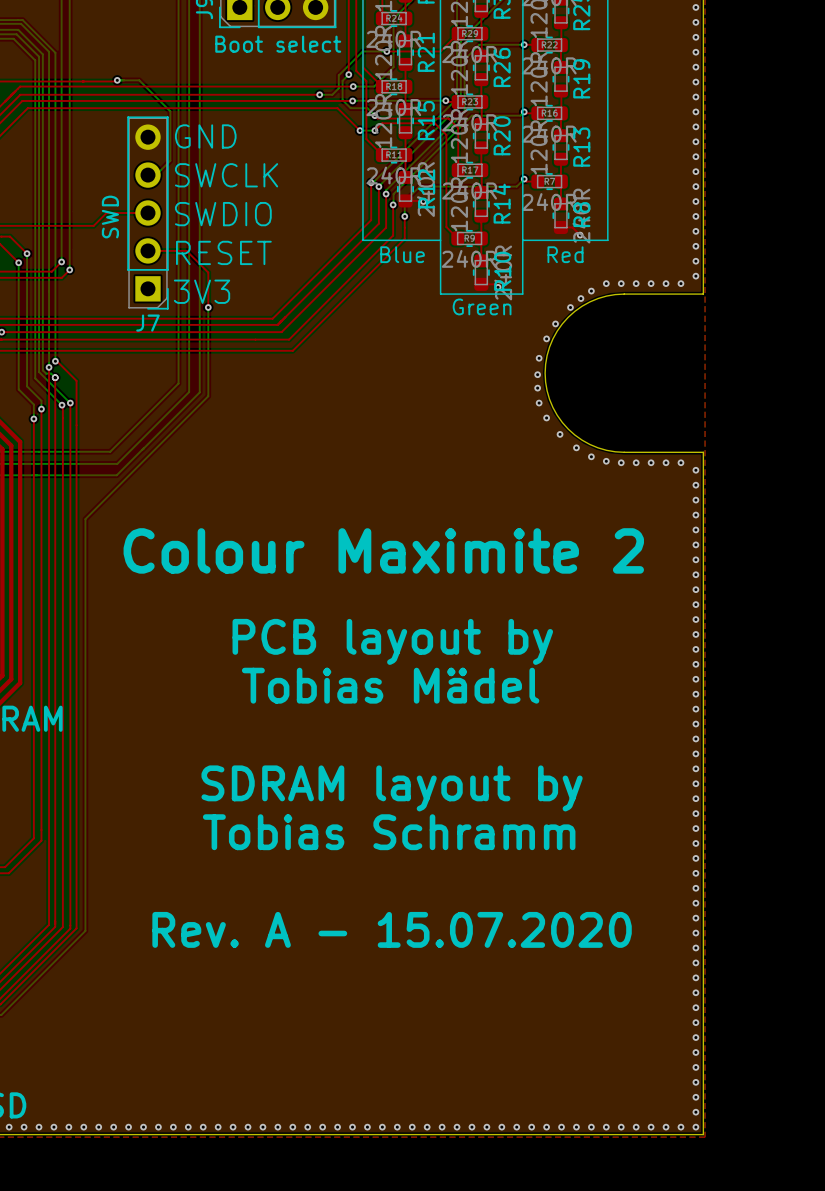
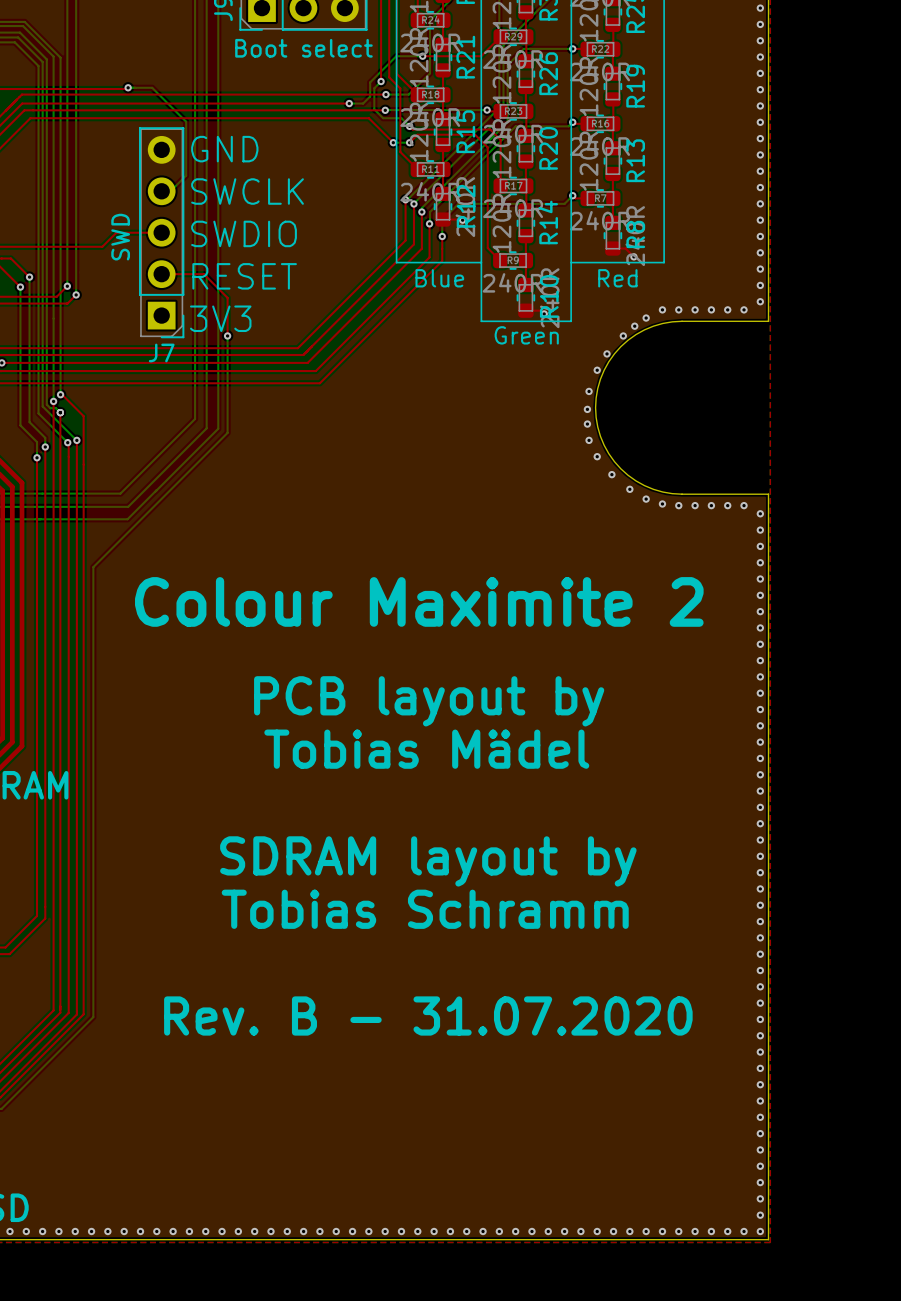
text: Rev. A - 15.07.2020 (392, 929) -> Rev. B - 31.07.2020 (428, 1015)

